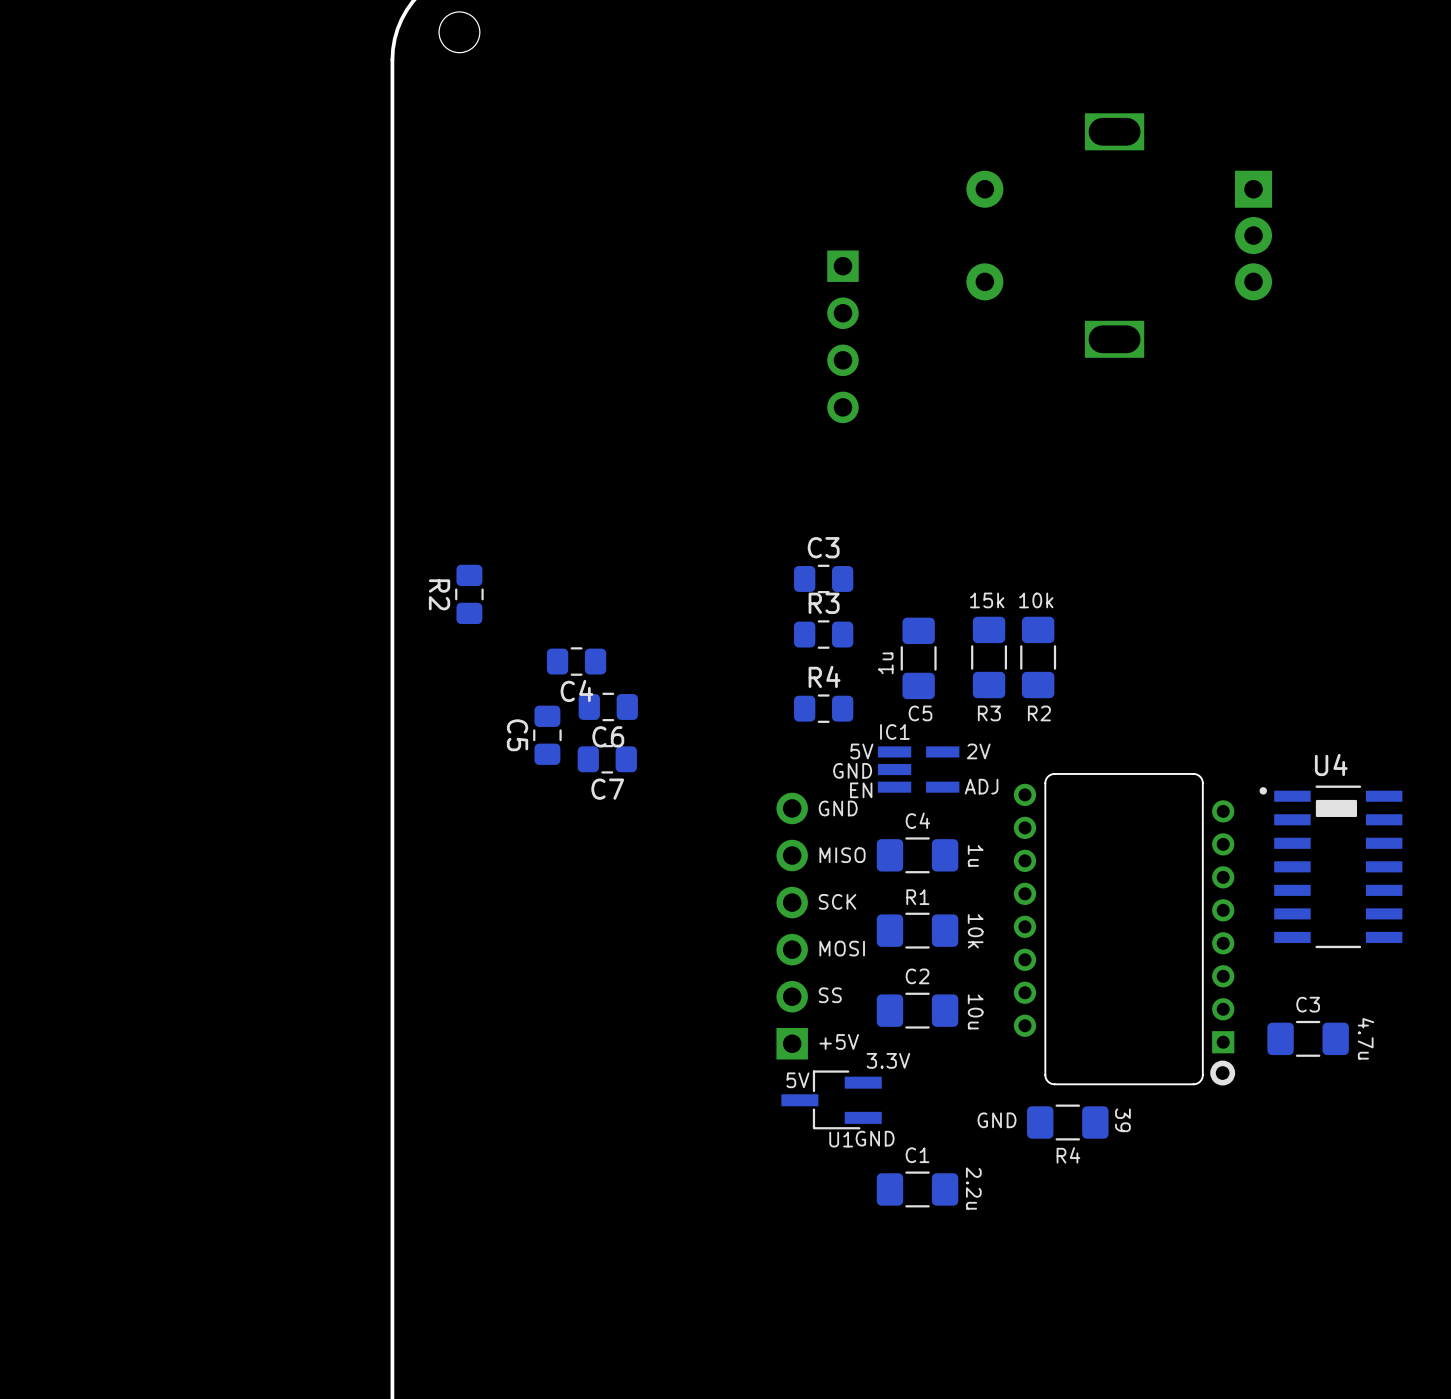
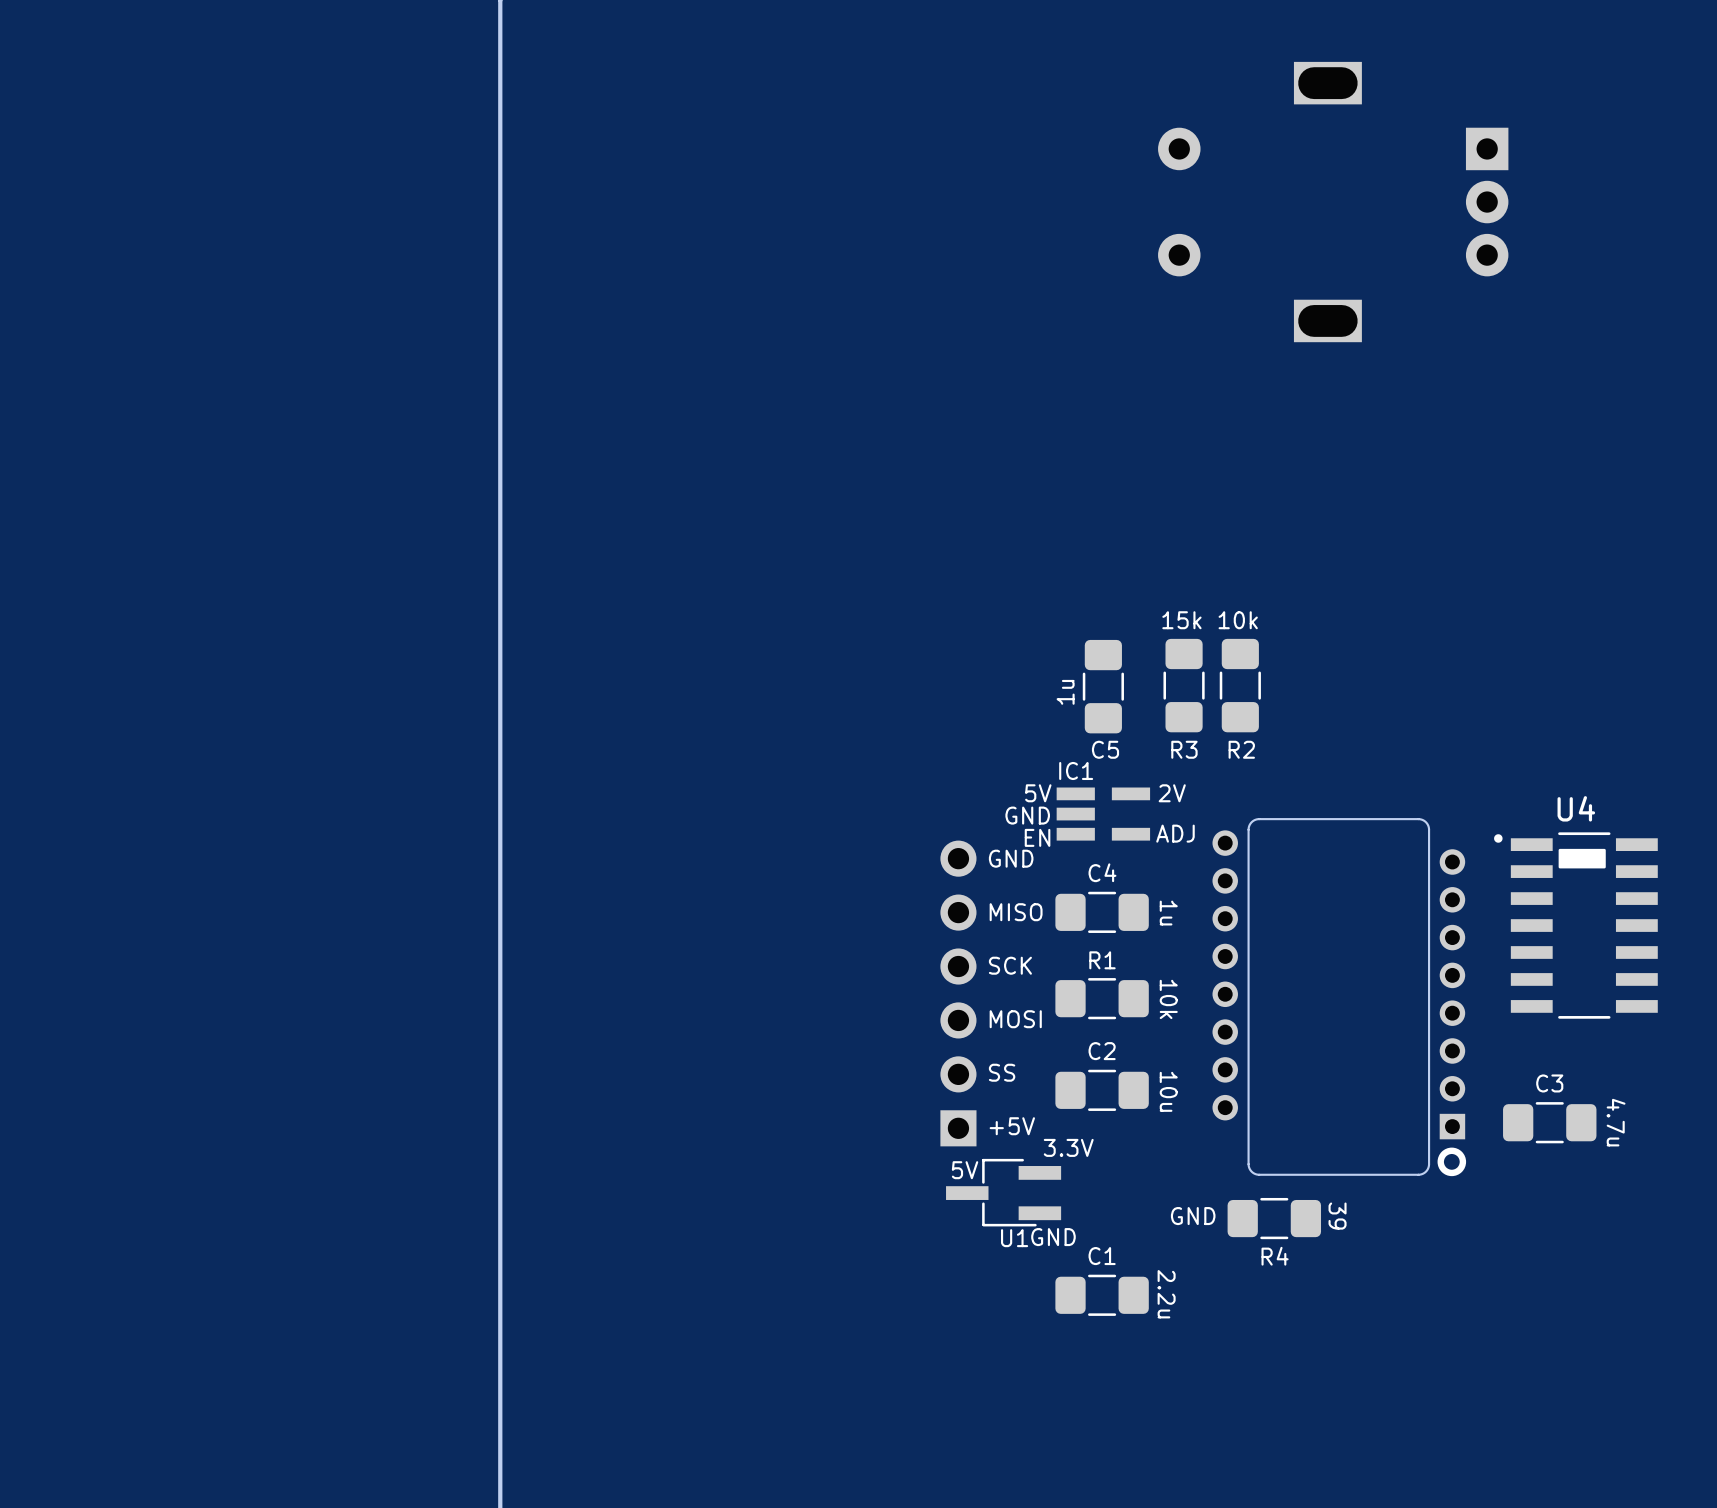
part: (842, 336) -> none
C3: (823, 578) -> none
R2: (469, 594) -> none
R3: (823, 634) -> none
C4: (576, 661) -> none
C6: (608, 706) -> none
R4: (823, 708) -> none
C5: (547, 735) -> none
C7: (607, 759) -> none

